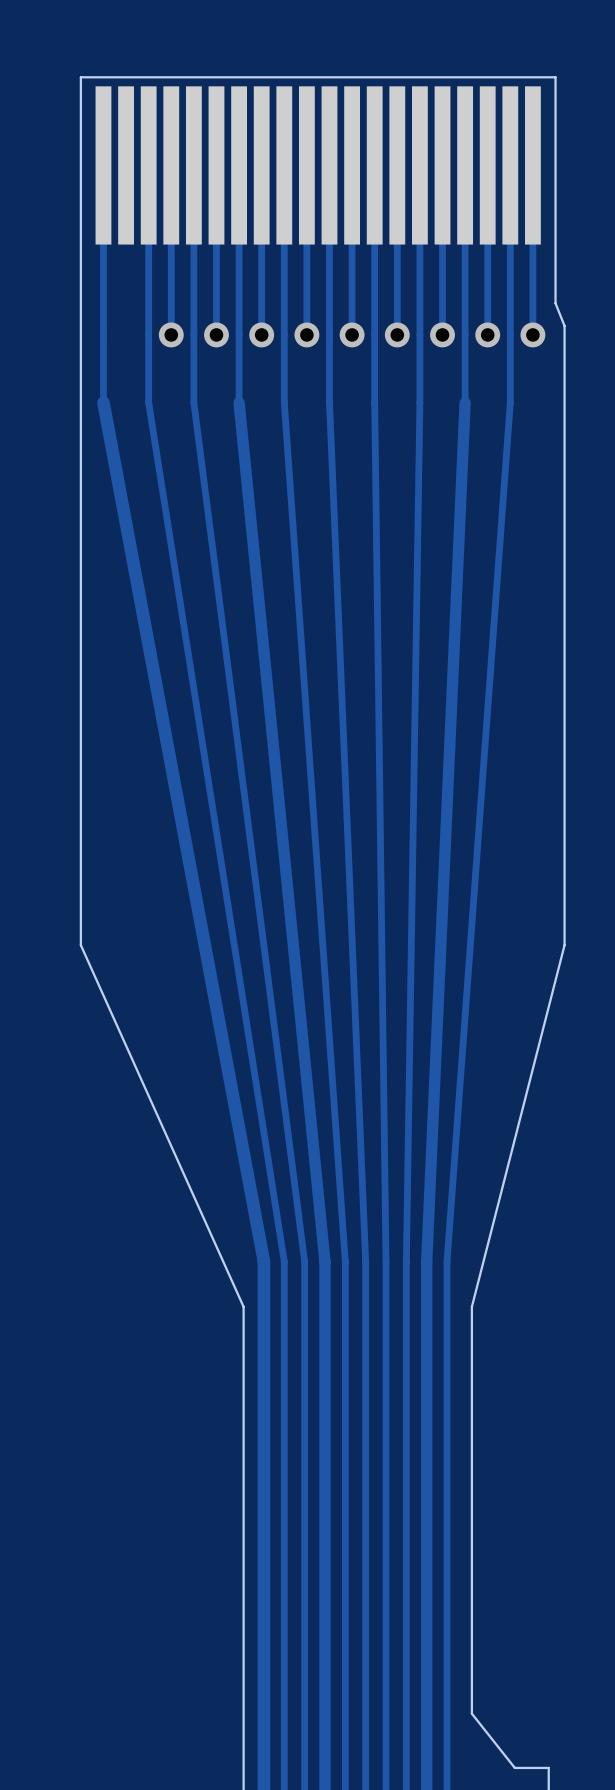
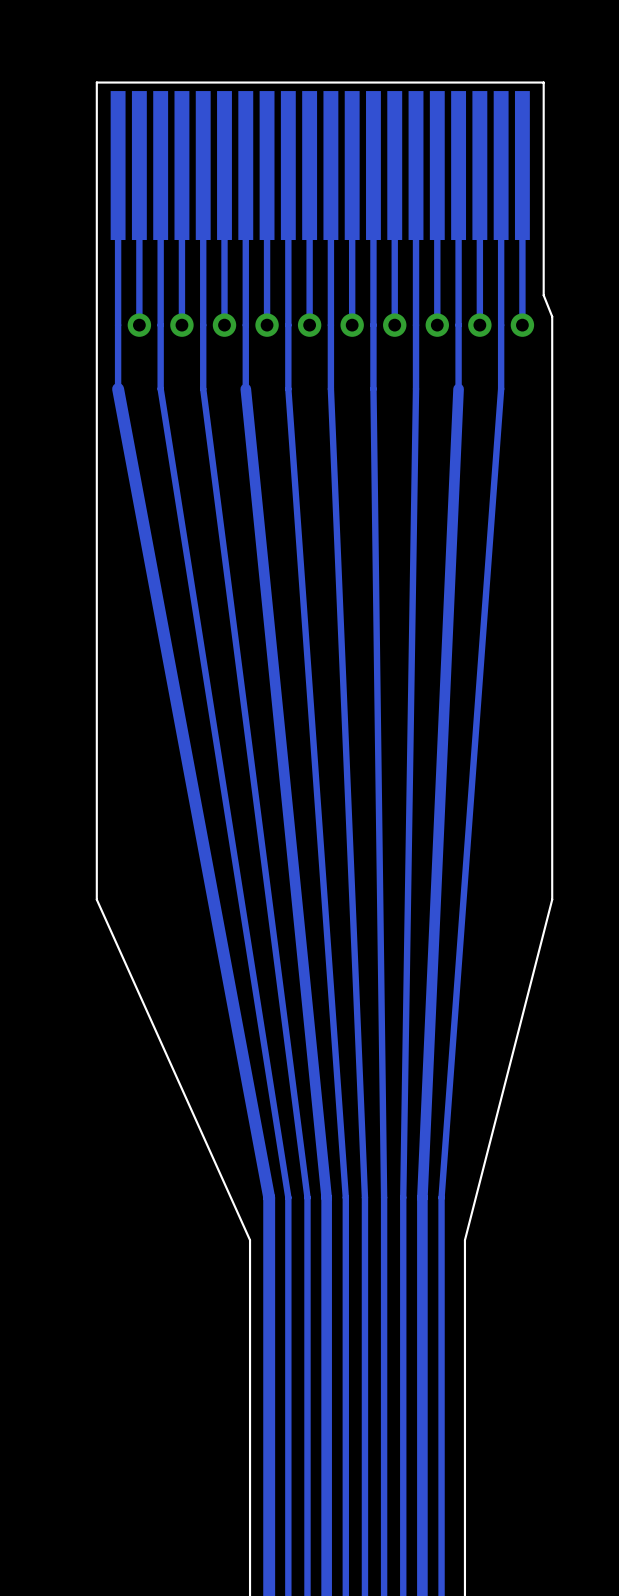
track: none -> (139, 165) (139, 325)
via: none -> (139, 325)

